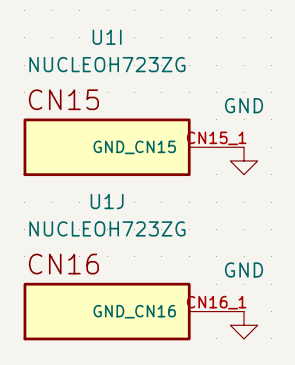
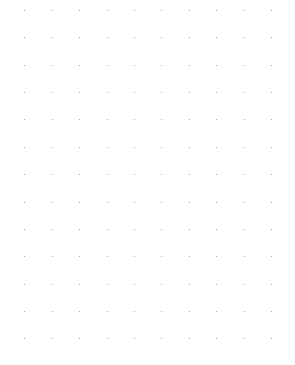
U1I: NUCLEOH723ZG (133, 147) -> none
power symbol: GND (244, 160) -> none
U1J: NUCLEOH723ZG (133, 311) -> none
power symbol: GND (244, 325) -> none

